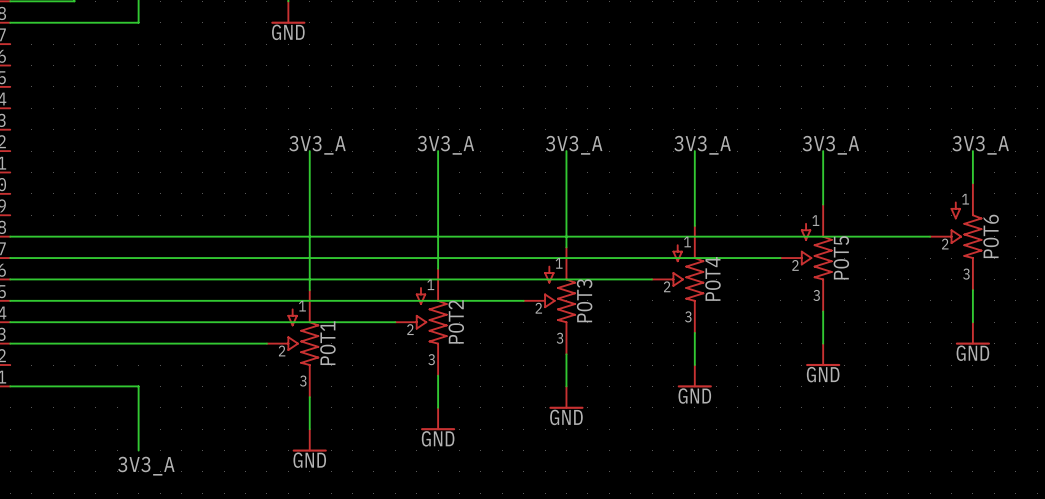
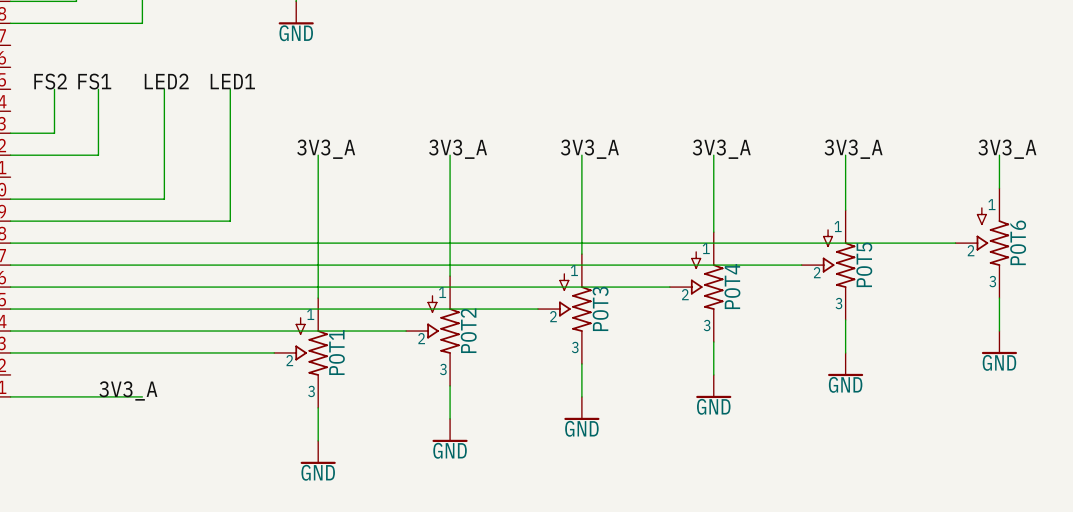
label: none -> FS2 (50, 81)
label: none -> FS1 (94, 81)
label: none -> LED2 (166, 81)
label: none -> LED1 (232, 81)
wire: none -> (54, 89) (54, 133) (10, 133)
wire: none -> (98, 89) (98, 155) (10, 155)
wire: none -> (164, 89) (164, 199) (10, 199)
wire: none -> (230, 89) (230, 221) (10, 221)
wire: (138, 386) (138, 450) -> none
label position: 3V3_A (146, 466) -> 3V3_A (128, 390)

